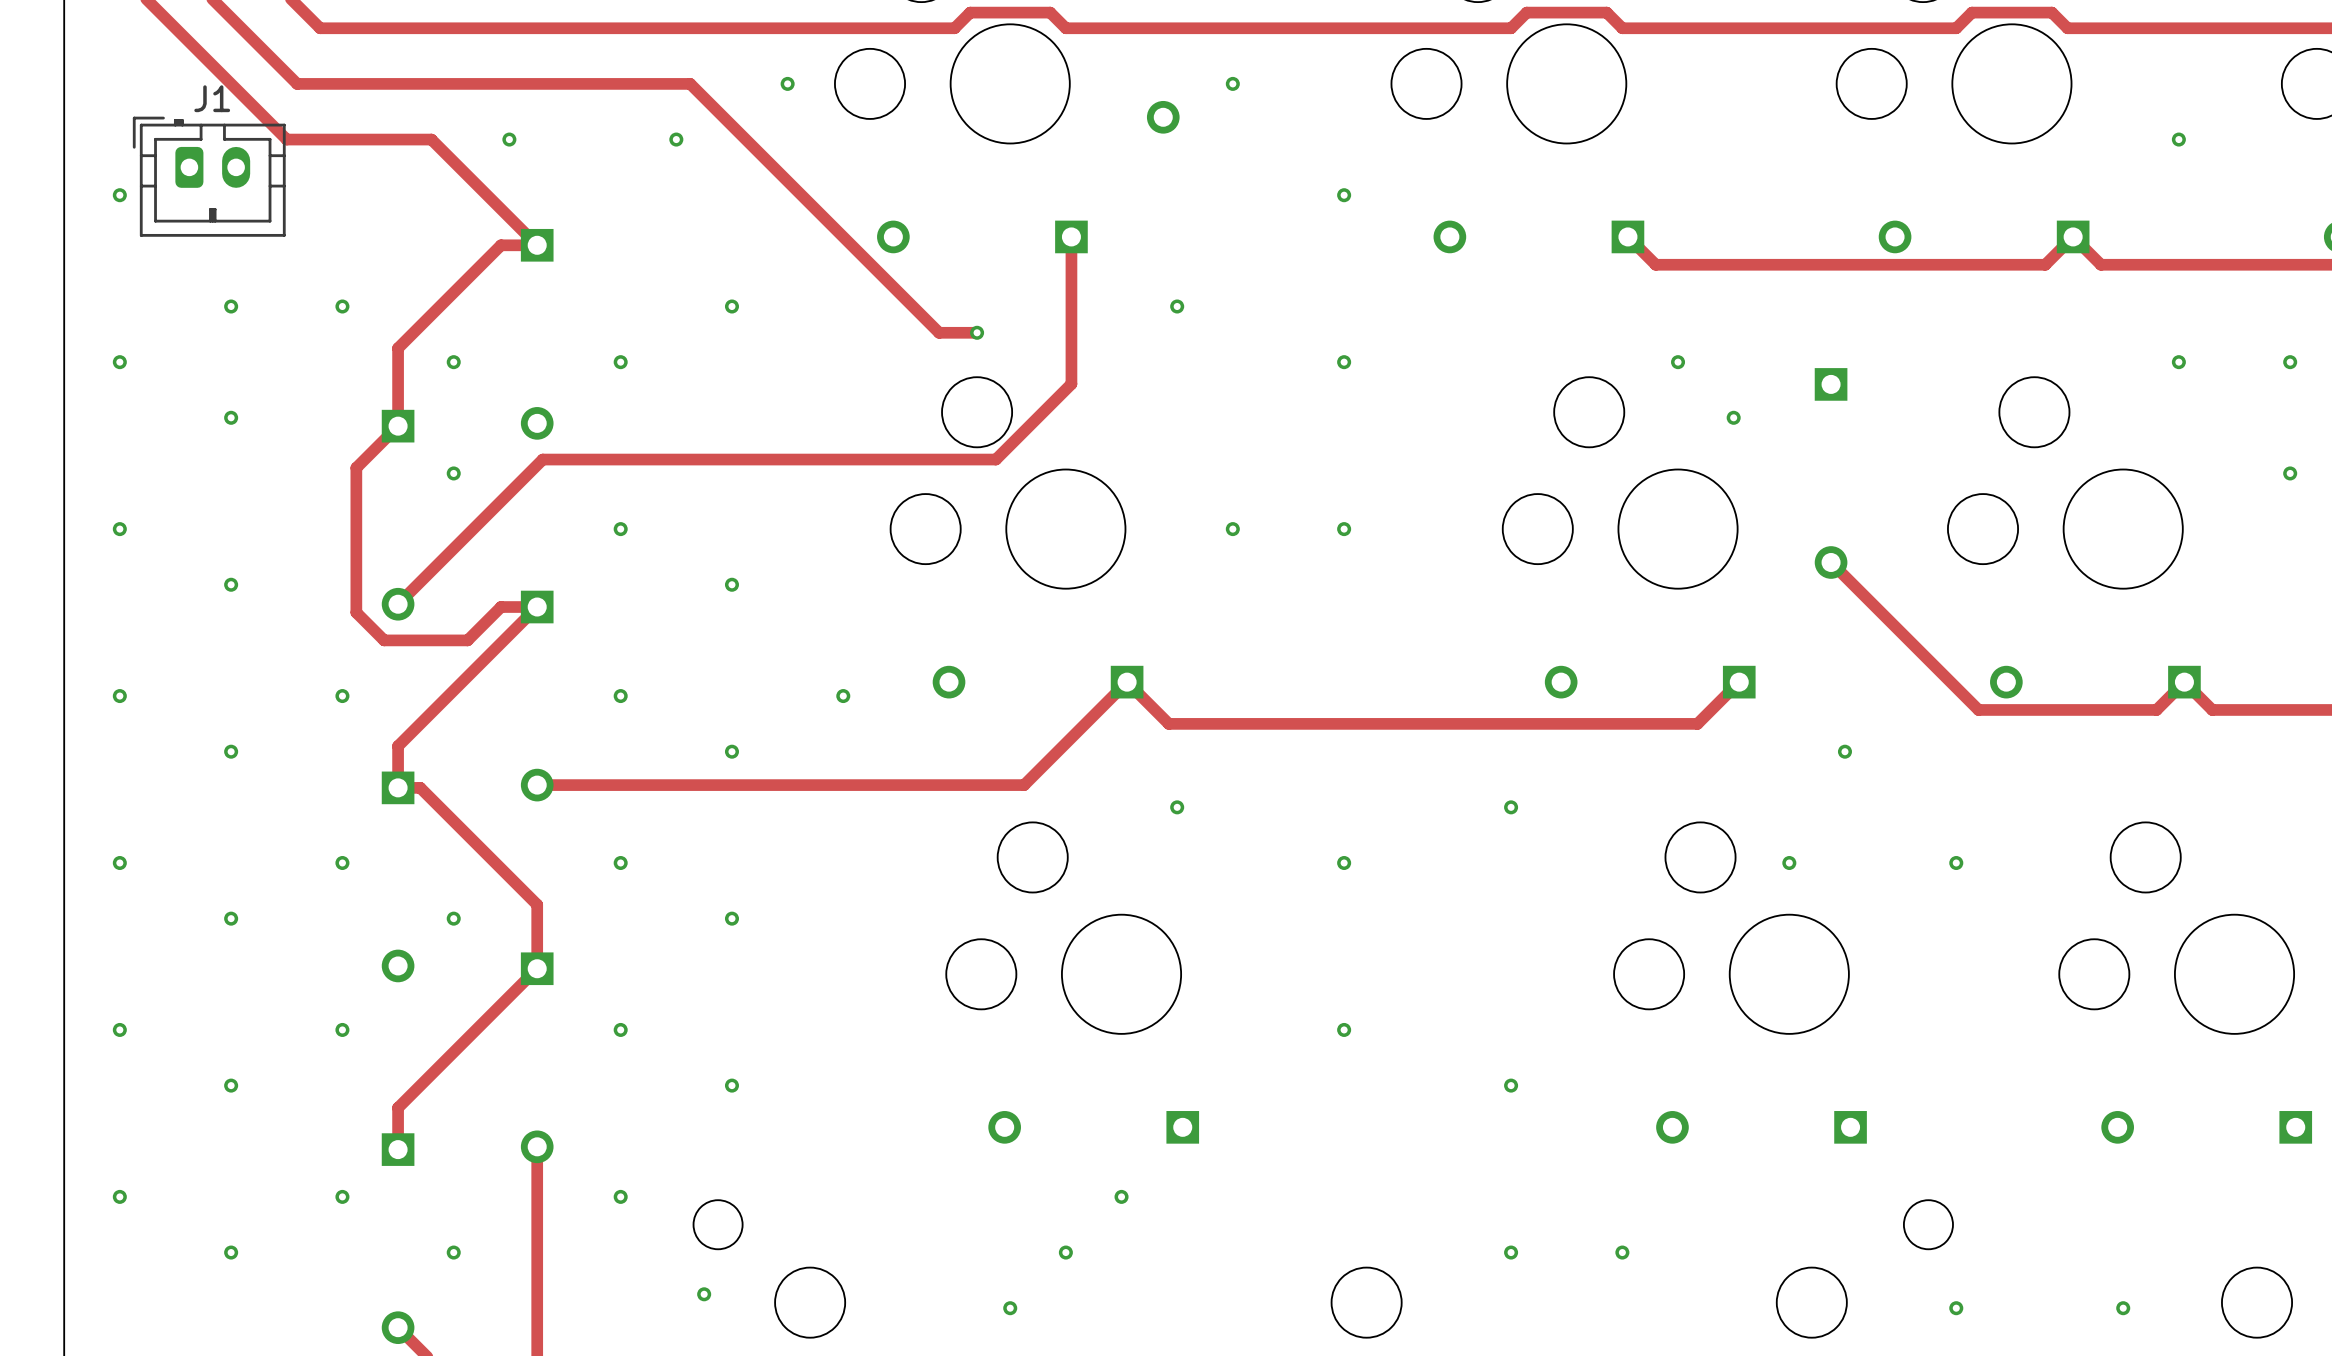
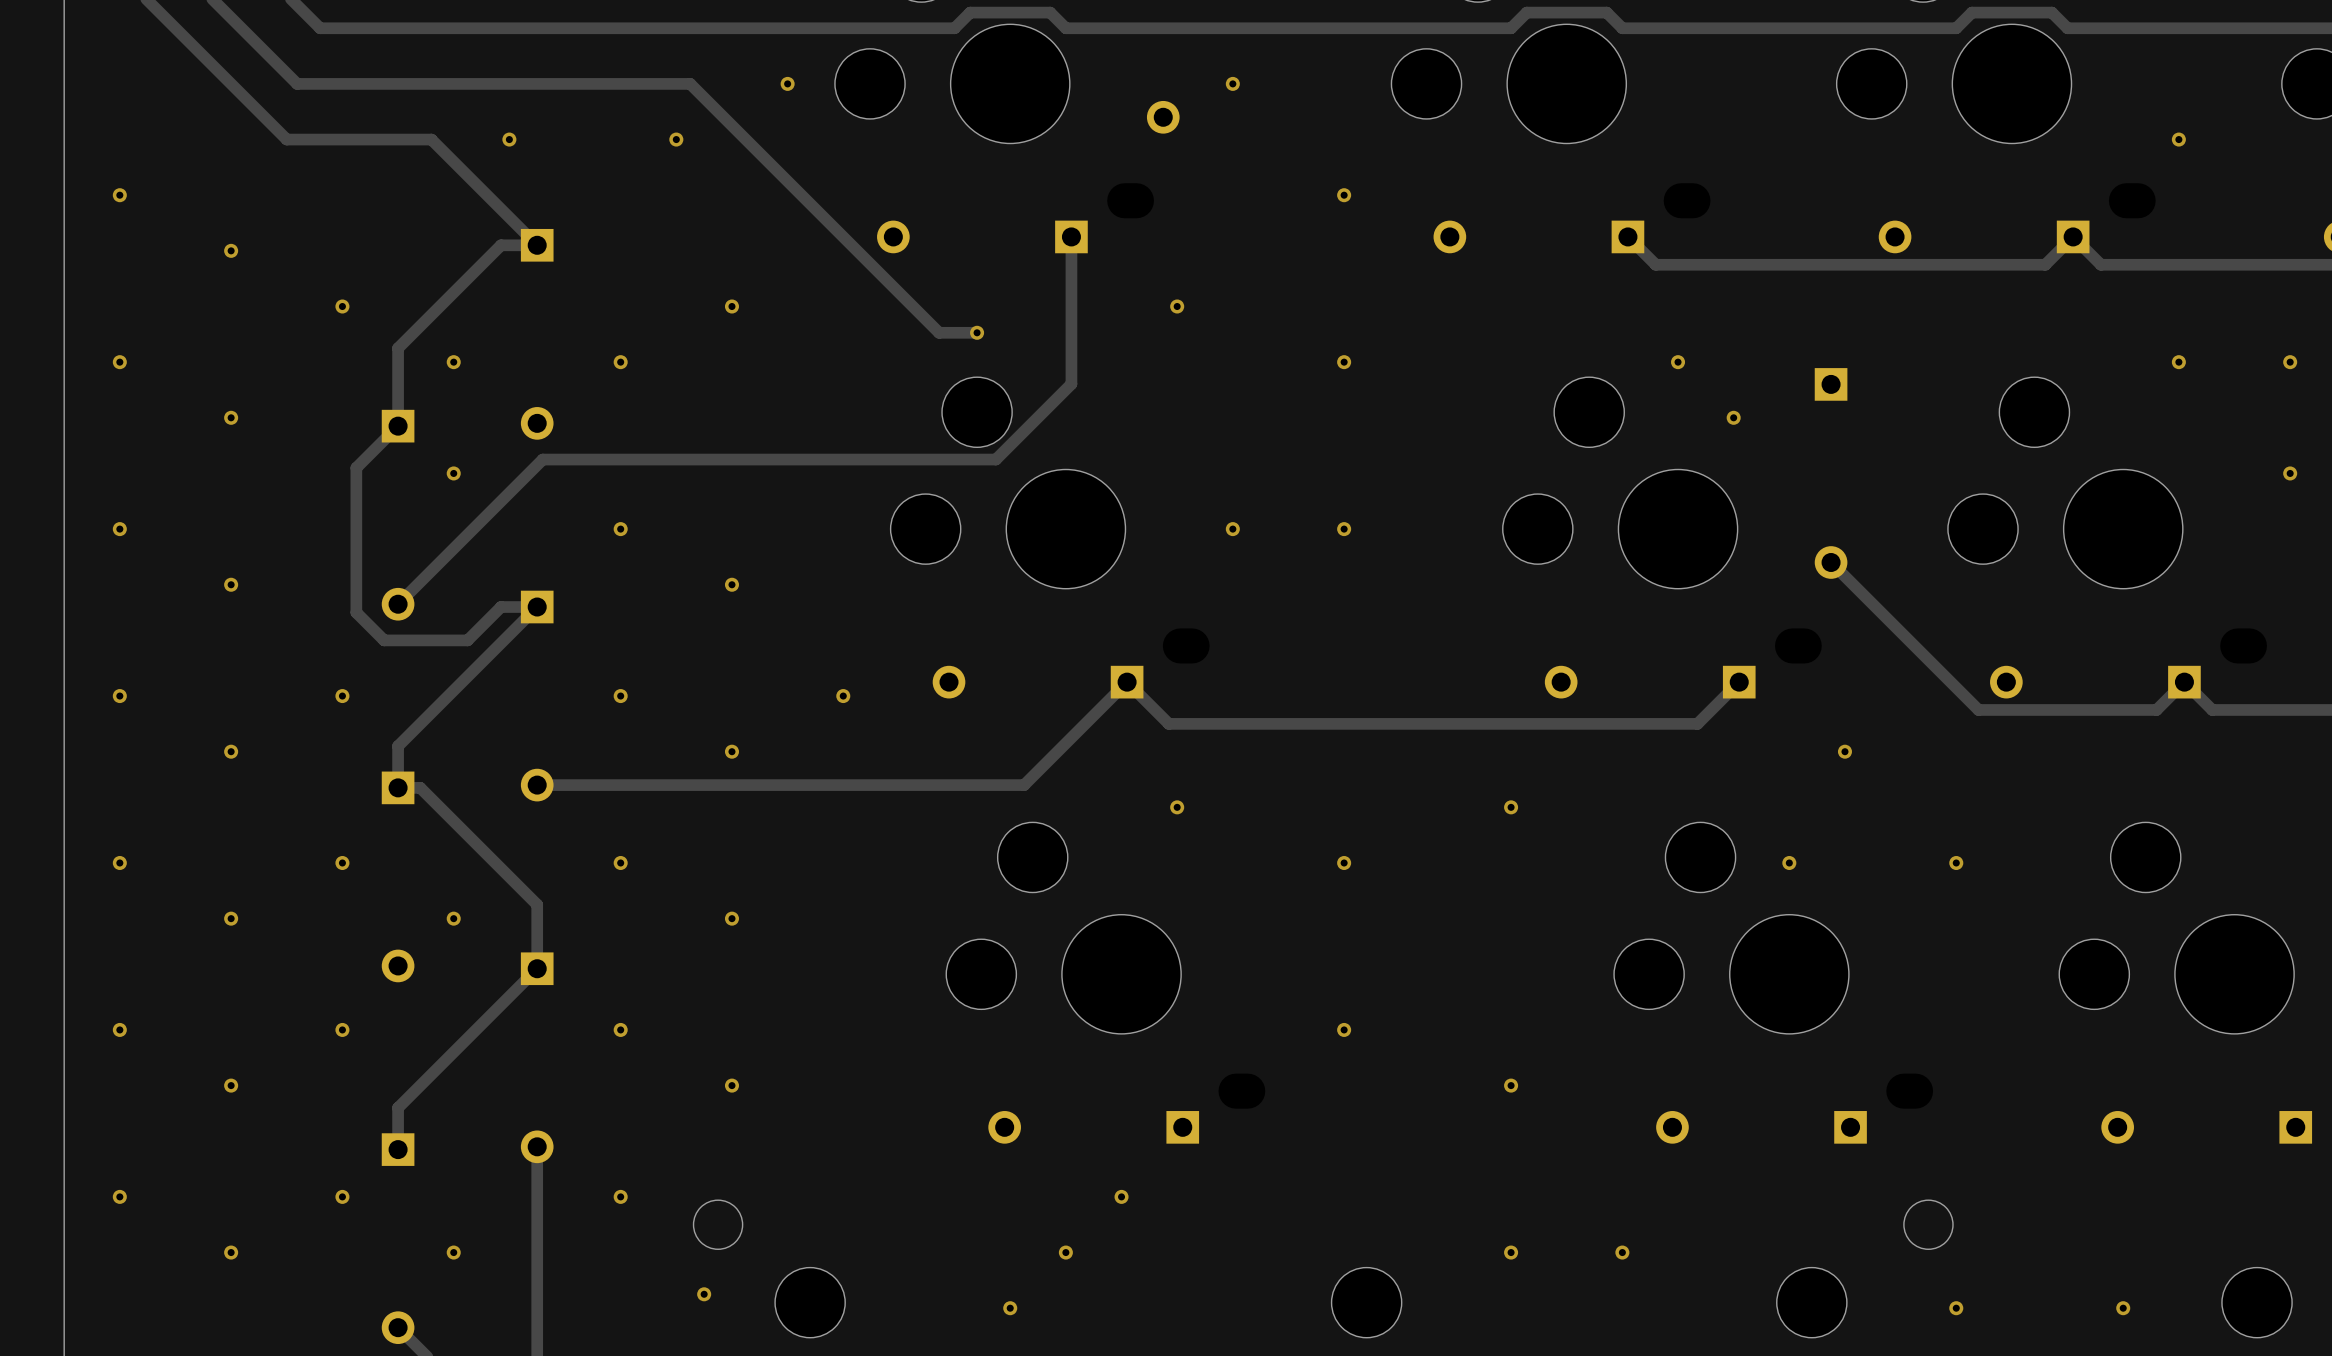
J1: (209, 176) -> none
via position: (231, 306) -> (231, 250)

